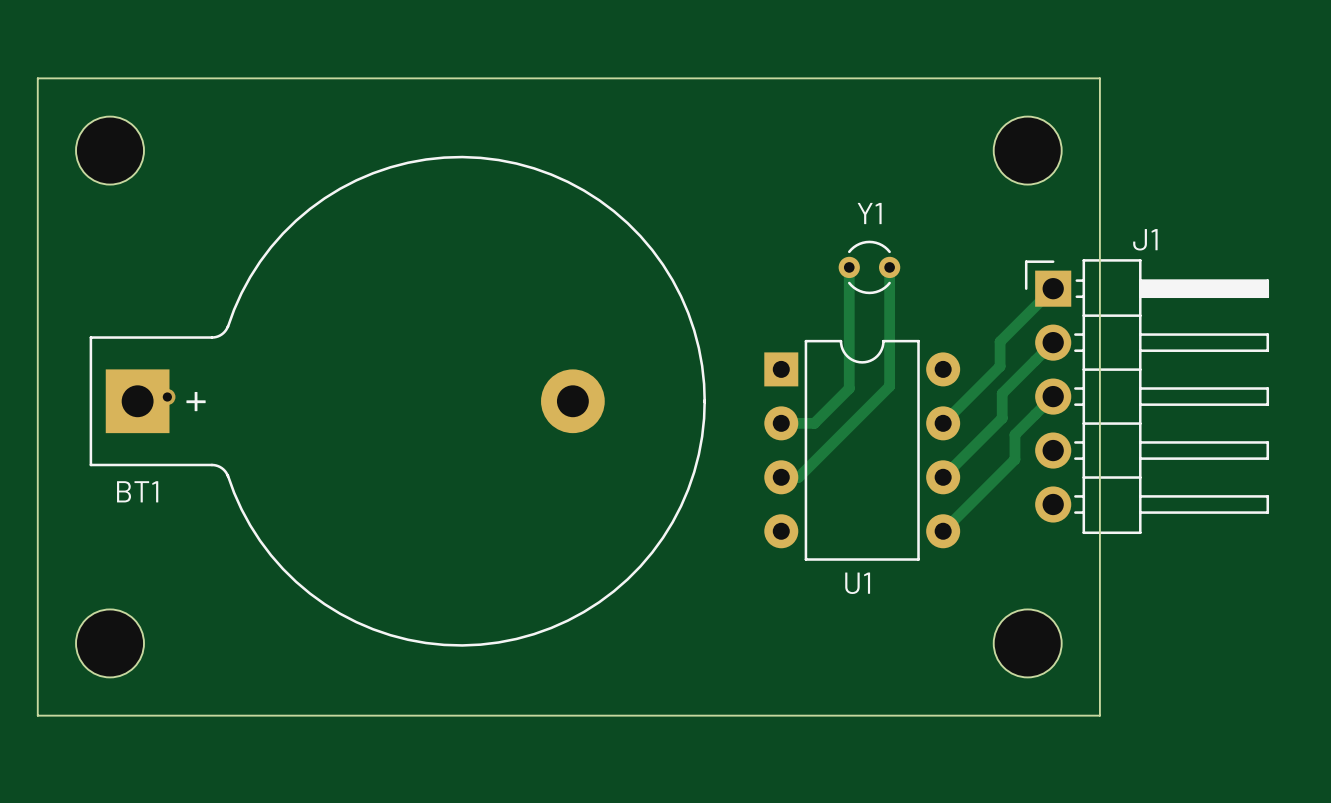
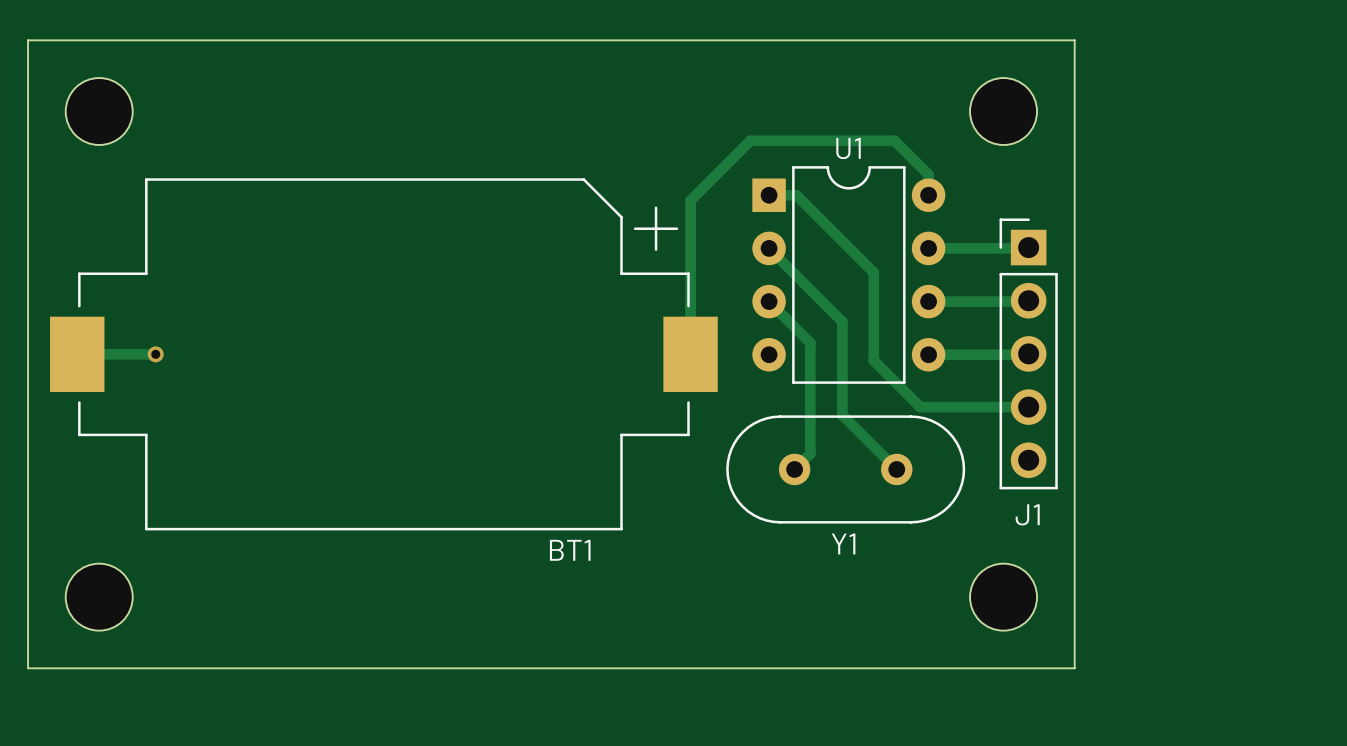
BT1 footprint: [89, 155, 706, 647] -> [50, 178, 718, 531]
Y1 name position: Y1 (869, 213) -> Y1 (843, 544)
track: none -> (769, 195) (796, 195) (873, 272) (873, 360) (920, 407) (1028, 407)
track: none -> (928, 195) (928, 174) (894, 140) (750, 140) (690, 200) (690, 354)
J1 name position: J1 (1145, 239) -> J1 (1027, 514)
Y1 footprint: [838, 240, 901, 295] -> [726, 415, 966, 524]
J1 footprint: [1024, 259, 1270, 535] -> [999, 218, 1058, 490]
track: (849, 267) (849, 388) (814, 423) (781, 423) -> none
track: (889, 267) (889, 386) (798, 477) (781, 477) -> none
track: none -> (769, 248) (842, 321) (842, 415) (896, 469)
track: (1052, 289) (1000, 341) (1000, 366) (943, 423) -> (1027, 248) (928, 248)
track: none -> (769, 301) (810, 342) (810, 453) (794, 469)
track: (1052, 343) (1002, 393) (1002, 418) (943, 477) -> (1027, 301) (928, 301)
track: none -> (77, 354) (155, 354)
track: (1052, 397) (1014, 434) (1014, 459) (943, 531) -> (1027, 354) (928, 354)
U1 position: (862, 450) -> (848, 274)
BT1 name position: BT1 (137, 491) -> BT1 (570, 550)
U1 name position: U1 (857, 583) -> U1 (848, 148)

